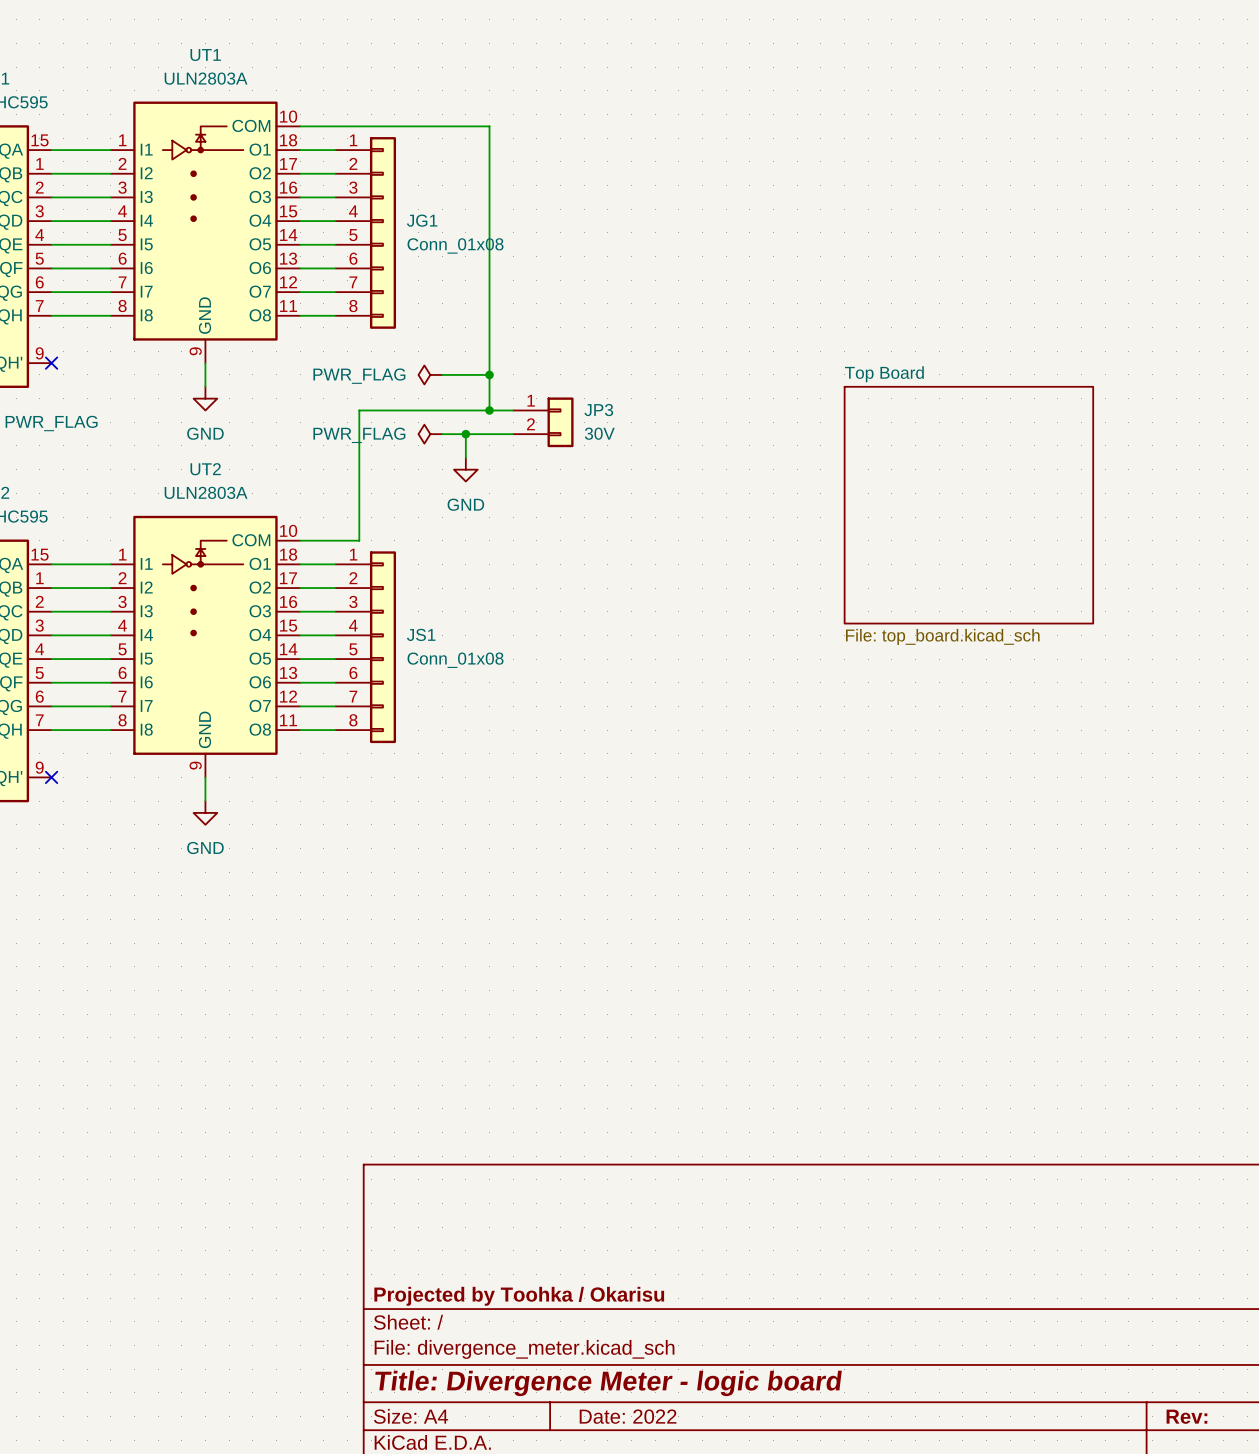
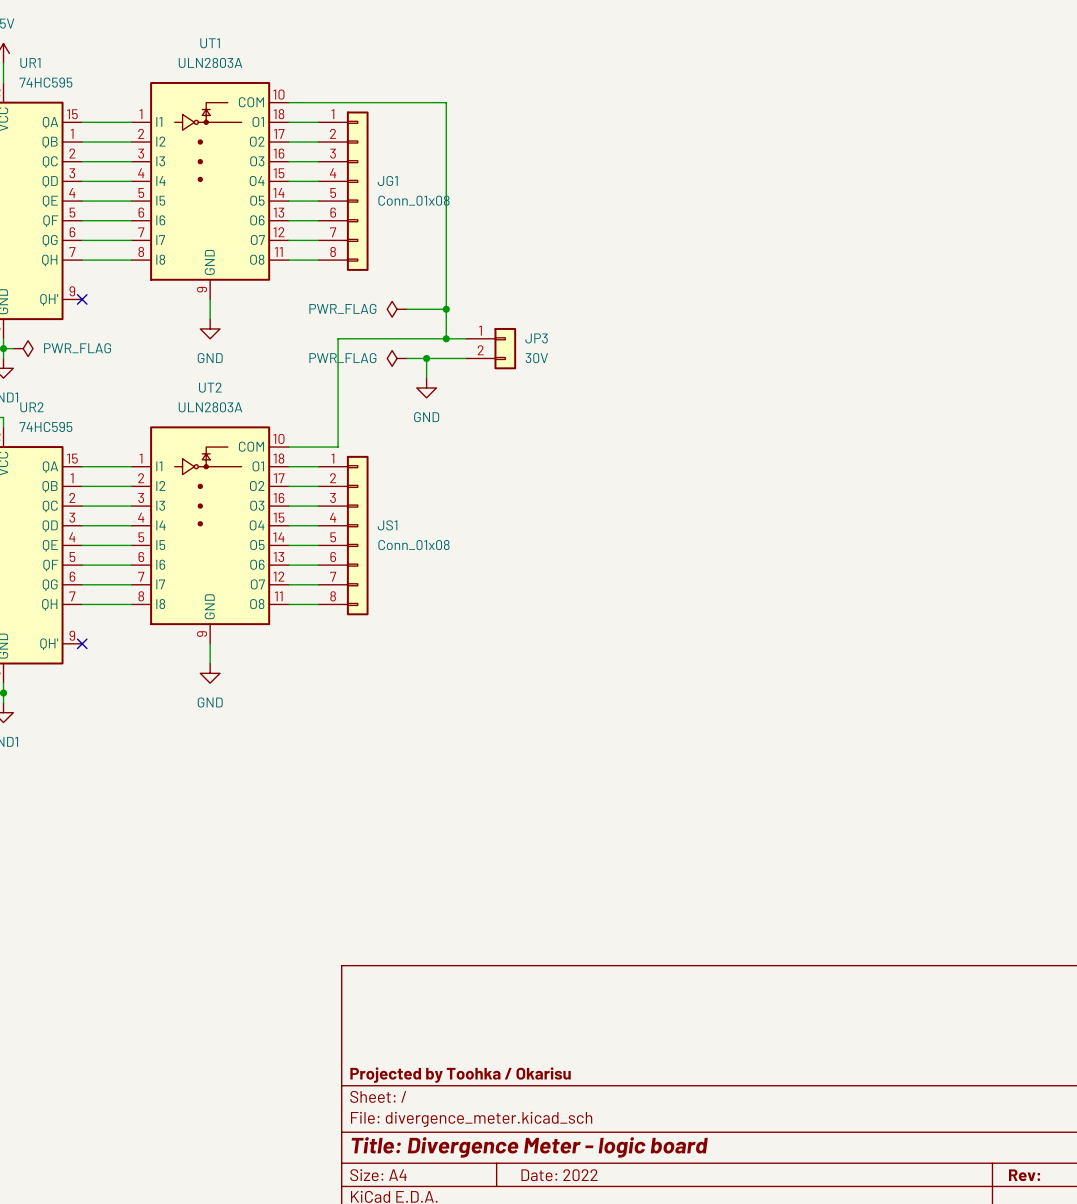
sheet Top Board: File: top_board.kicad_sch (968, 505) -> none

